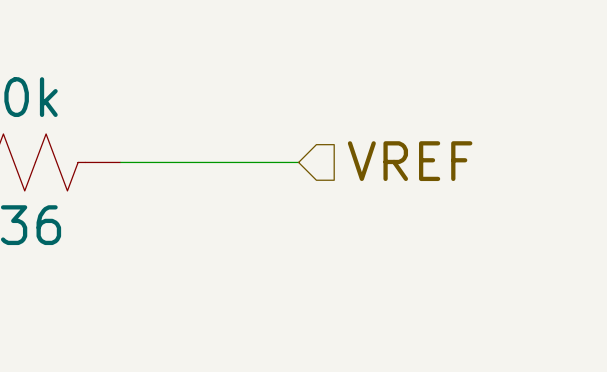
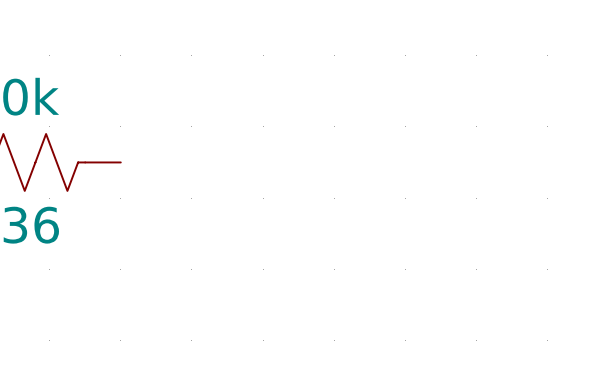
hierarchical label: VREF (410, 161) -> none
wire: (120, 162) (298, 162) -> none

